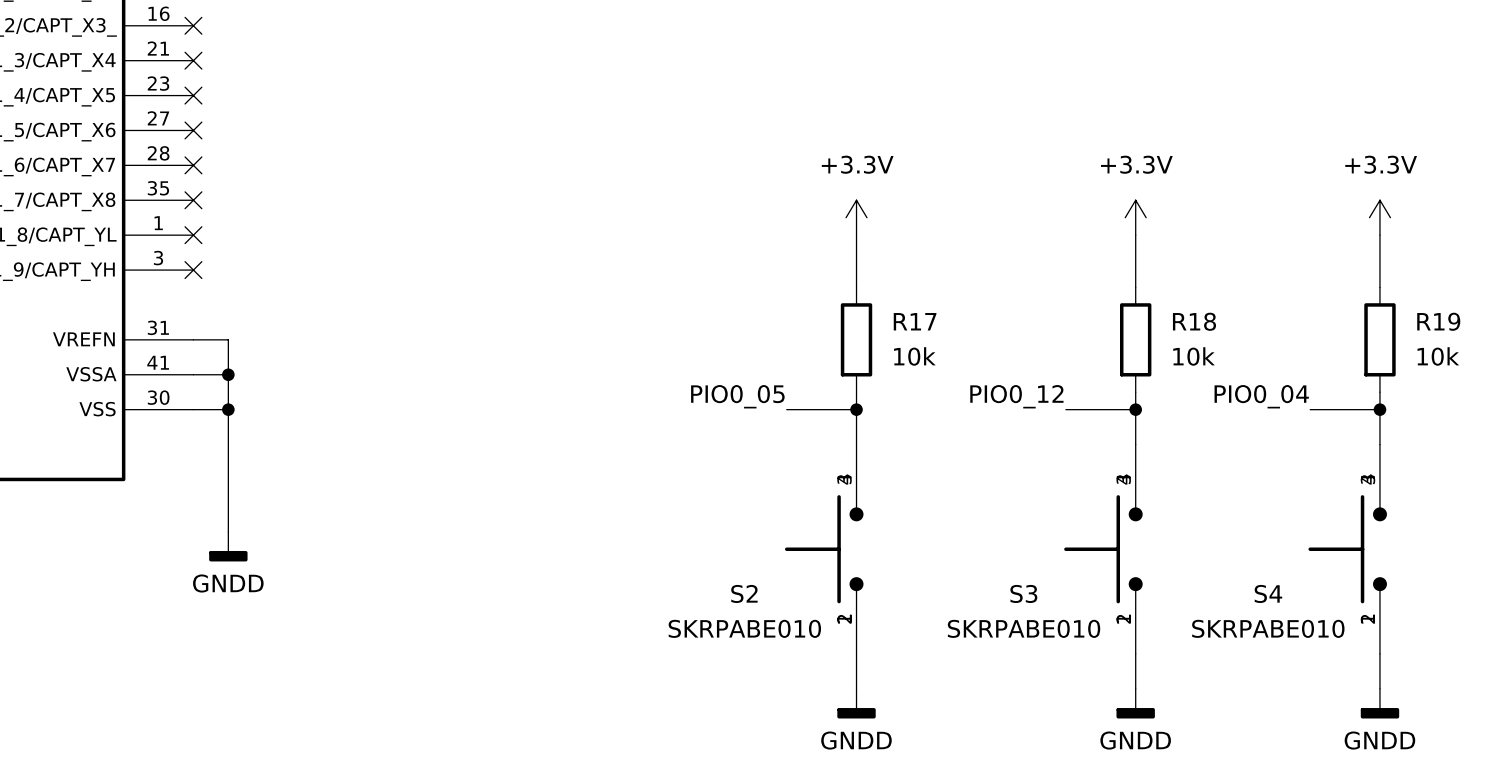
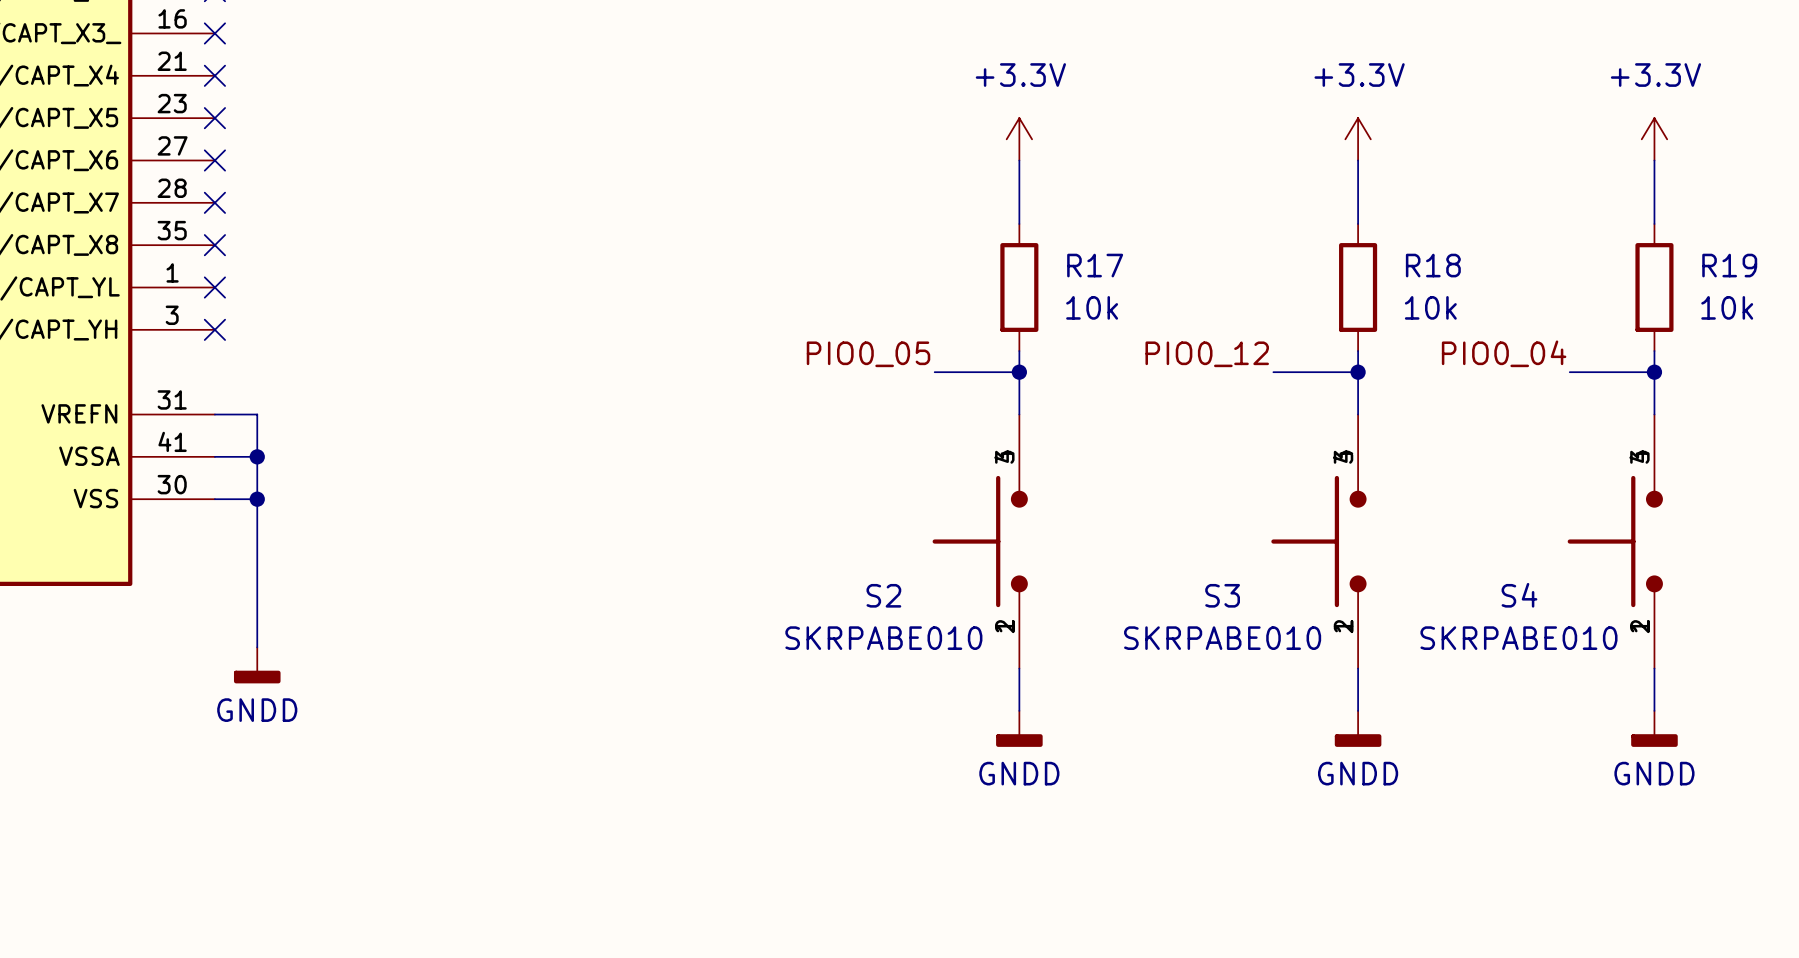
power symbol position: +3.3V (856, 217) -> +3.3V (1019, 139)
power symbol position: +3.3V (1135, 217) -> +3.3V (1358, 139)
power symbol position: +3.3V (1379, 217) -> +3.3V (1654, 139)
wire: (856, 235) (856, 287) -> (1019, 414) (1019, 351)
wire: (1135, 235) (1135, 287) -> (1358, 414) (1358, 351)
wire: (1379, 235) (1379, 287) -> (1654, 414) (1654, 351)
junction: none -> (1019, 372)
junction: none -> (1358, 372)
junction: none -> (1654, 372)
R17 position: (856, 339) -> (1019, 287)
R18 position: (1135, 339) -> (1358, 287)
R19 position: (1379, 339) -> (1654, 287)
wire: (856, 392) (856, 444) -> (1019, 160) (1019, 223)
wire: (1135, 392) (1135, 444) -> (1358, 160) (1358, 223)
wire: (1379, 392) (1379, 444) -> (1654, 160) (1654, 223)
label position: PIO0_05 (737, 396) -> PIO0_05 (868, 354)
label position: PIO0_12 (1016, 396) -> PIO0_12 (1207, 354)
label position: PIO0_04 (1261, 396) -> PIO0_04 (1504, 353)
wire: (786, 409) (856, 409) -> (934, 372) (1019, 372)
junction: (856, 409) -> none
wire: (1065, 409) (1135, 409) -> (1273, 372) (1358, 372)
junction: (1135, 409) -> none
wire: (1310, 409) (1379, 409) -> (1569, 372) (1654, 372)
junction: (1379, 409) -> none
S2 position: (824, 549) -> (980, 541)
S3 position: (1103, 549) -> (1318, 541)
S4 position: (1347, 549) -> (1615, 541)
wire: (856, 653) (856, 688) -> (1019, 668) (1019, 710)
wire: (1135, 653) (1135, 688) -> (1358, 668) (1358, 710)
wire: (1379, 653) (1379, 688) -> (1654, 668) (1654, 710)
power symbol position: GNDD (856, 703) -> GNDD (1019, 728)
power symbol position: GNDD (1135, 703) -> GNDD (1358, 728)
power symbol position: GNDD (1379, 703) -> GNDD (1654, 728)

